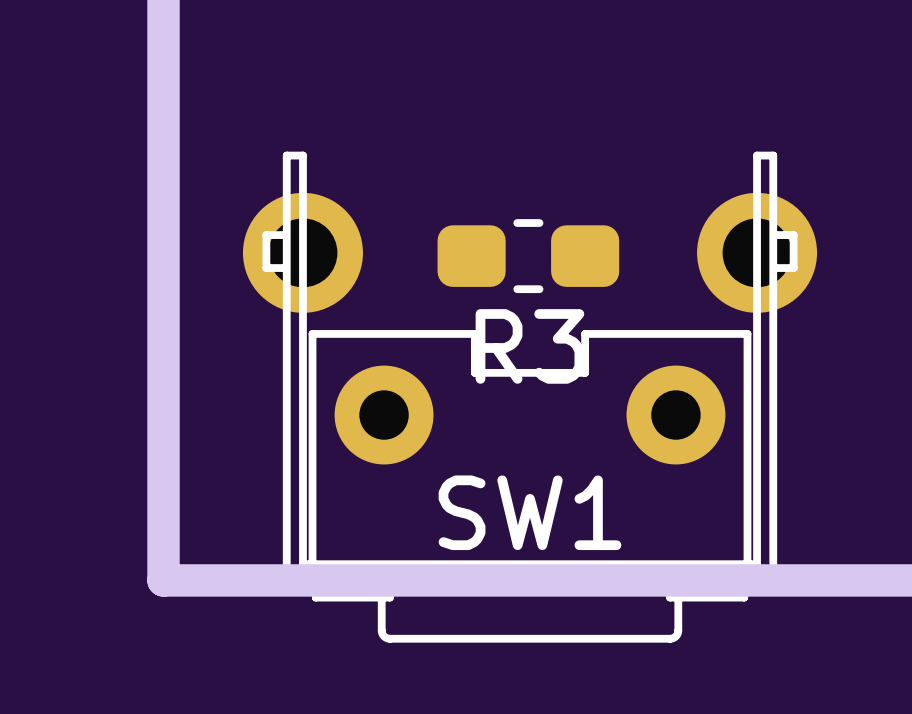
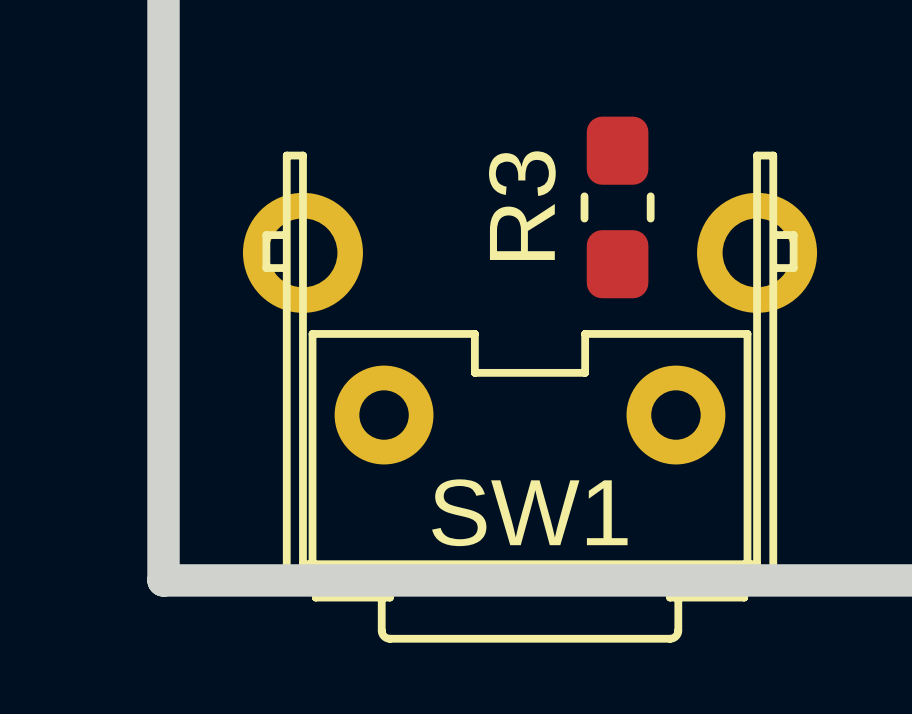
R3 rotation: 0° (528, 256) -> 90° clockwise (617, 207)

